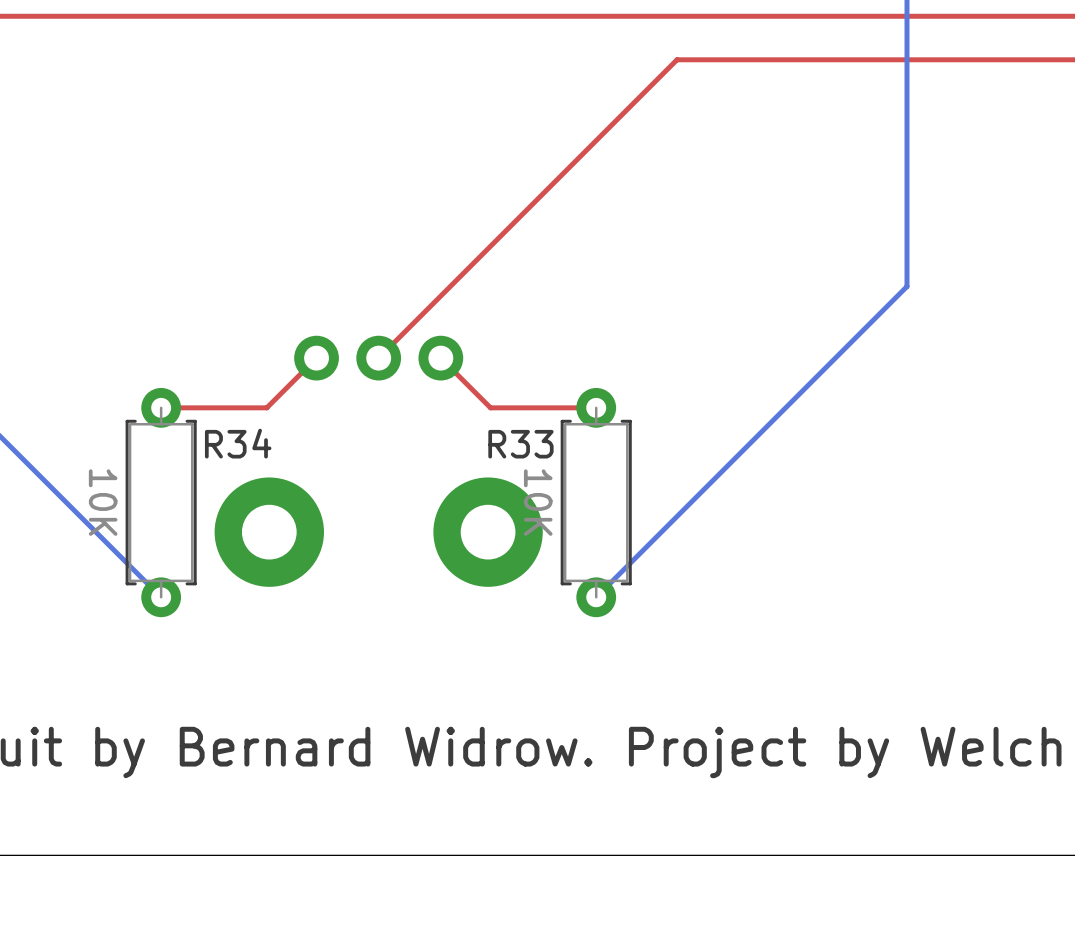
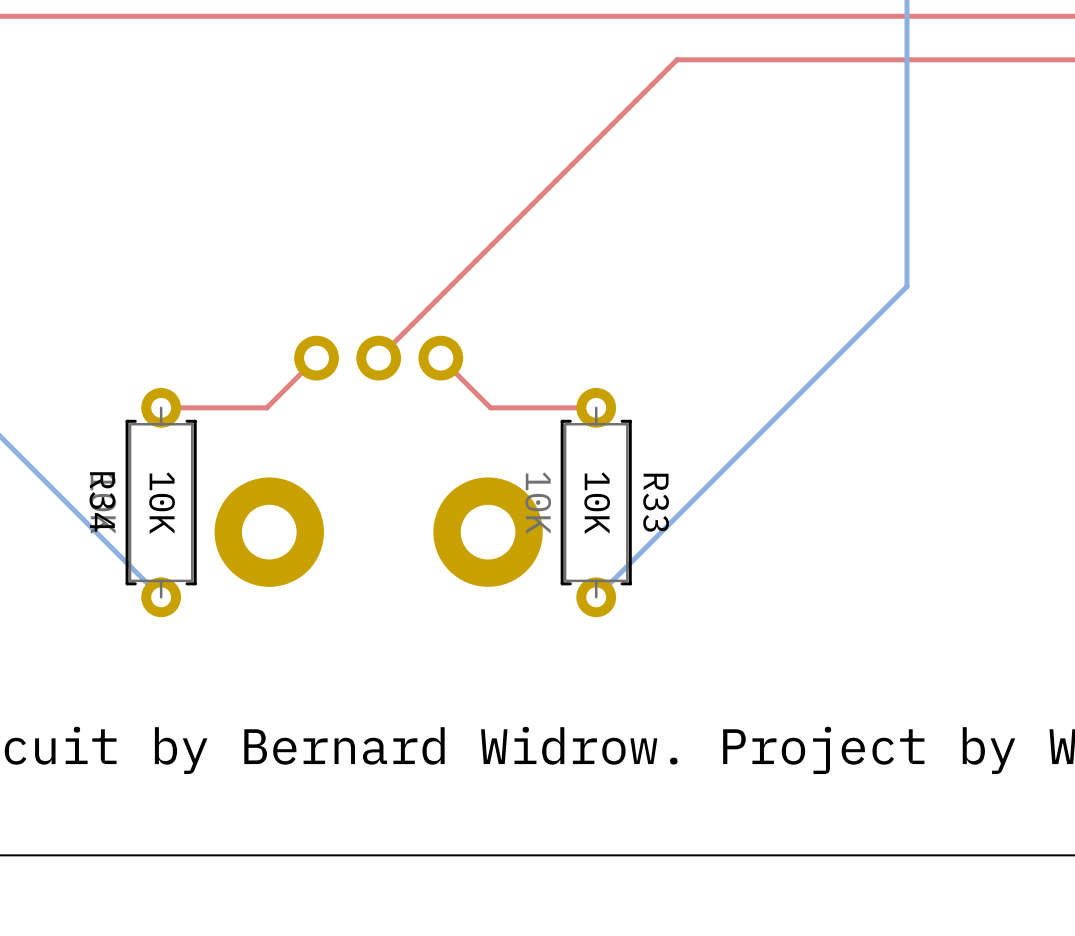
R34 name rotation: 0° (238, 443) -> 90° clockwise (102, 502)
R34 name position: R34 (238, 443) -> R34 (102, 502)
R33 name rotation: 0° (520, 444) -> 90° clockwise (656, 502)
R33 name position: R33 (520, 444) -> R33 (656, 502)
R34 text: none -> 10K (162, 503)
R33 text: none -> 10K (597, 503)

